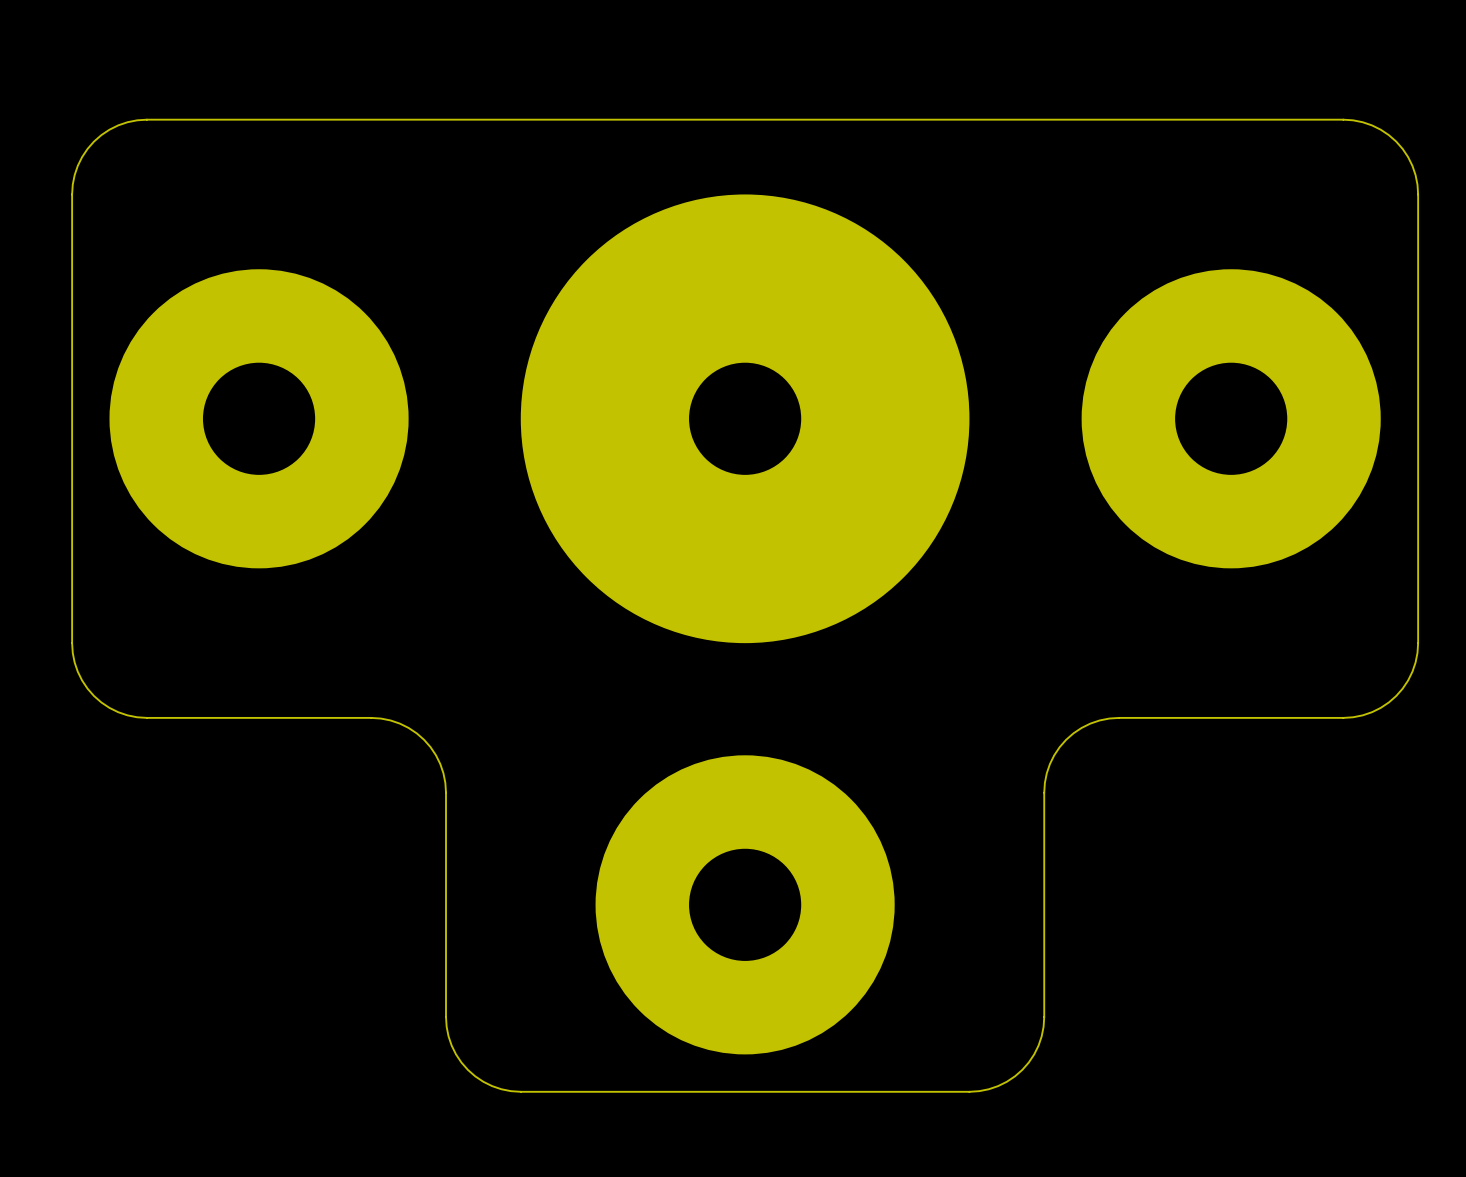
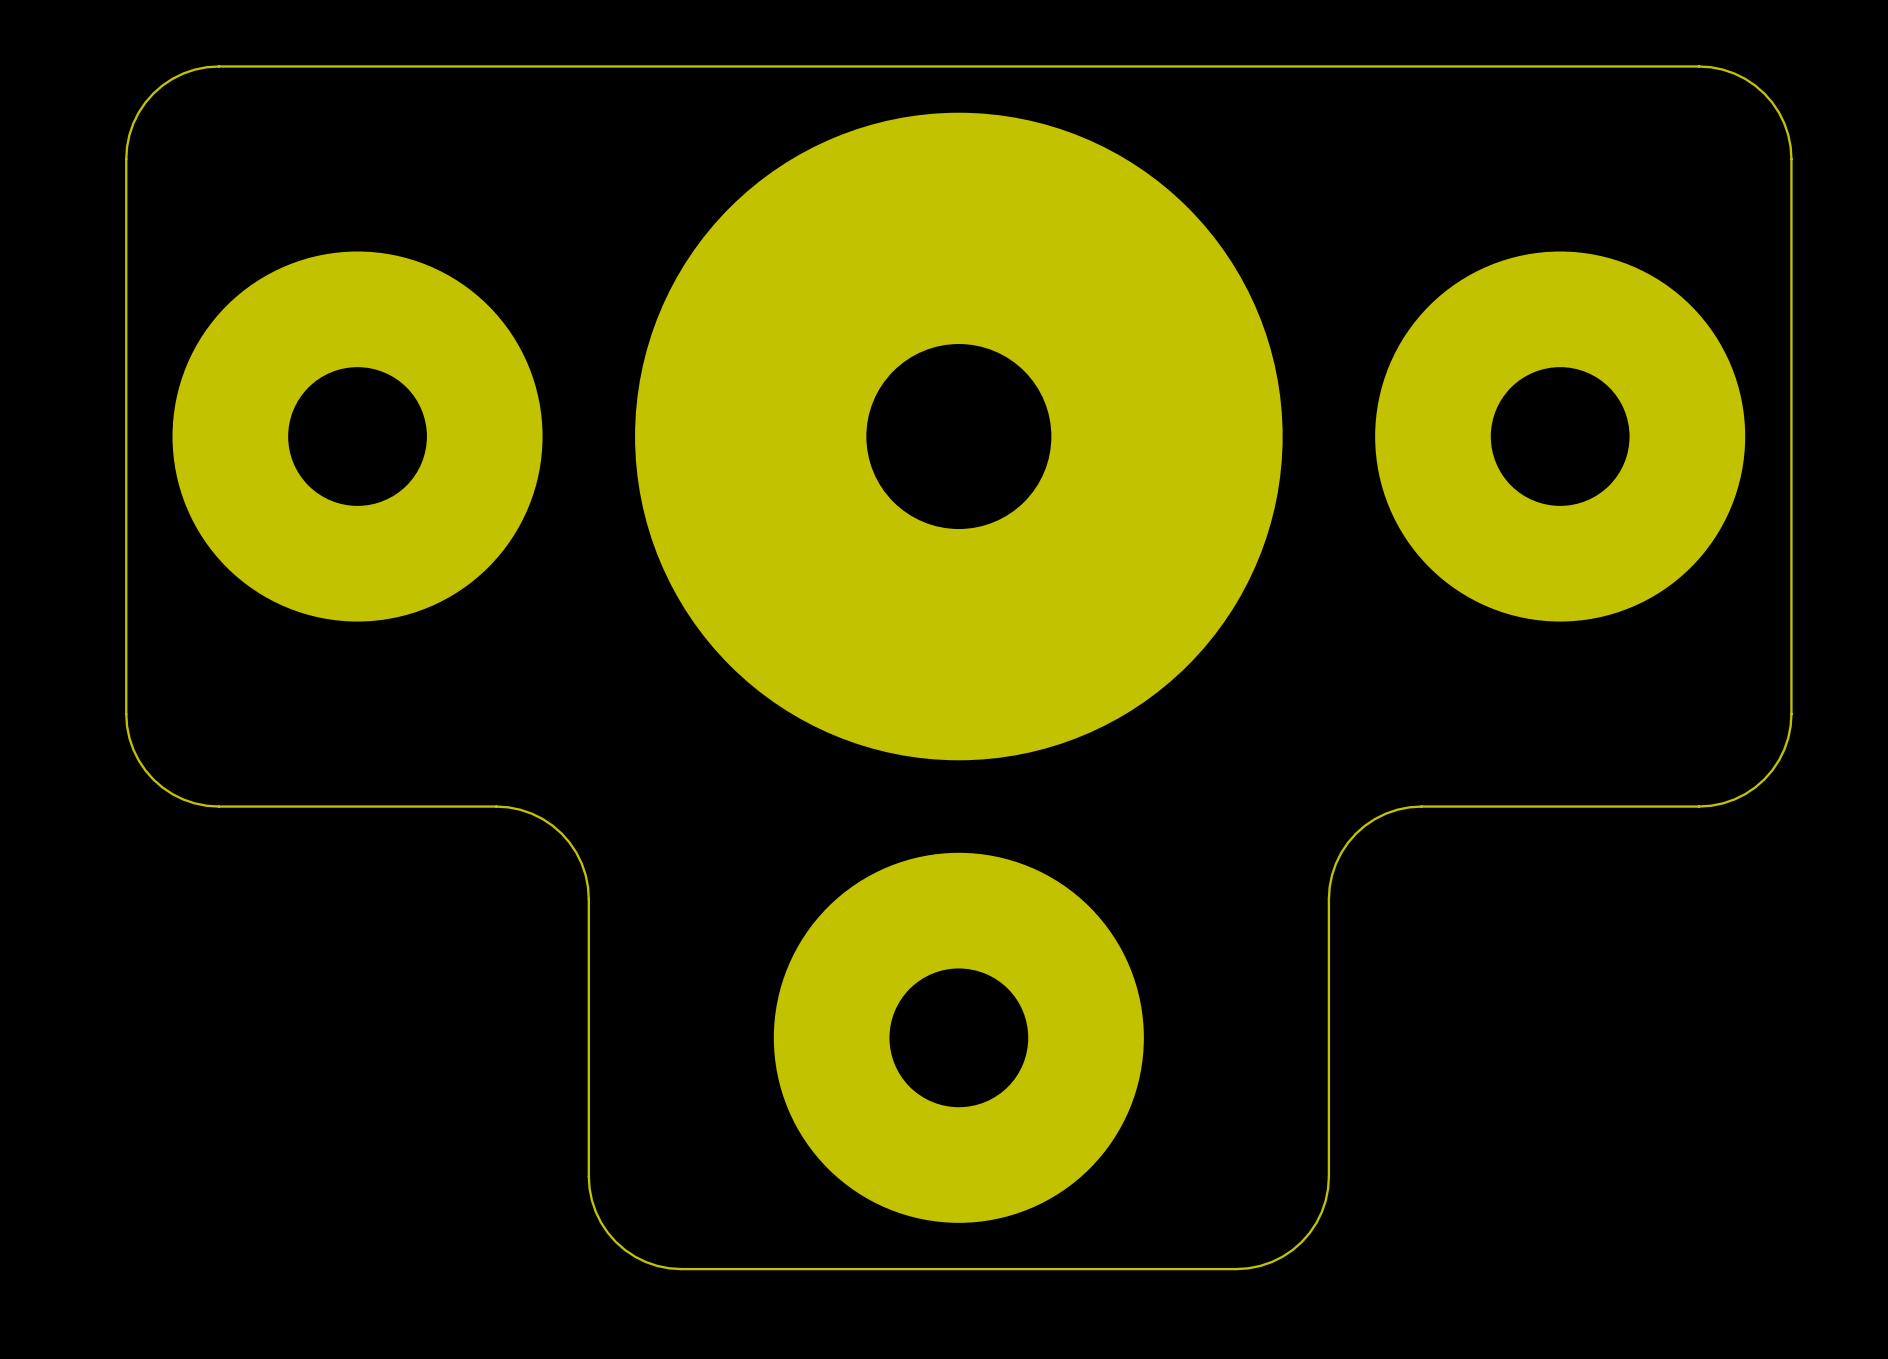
part footprint: [520, 194, 970, 644] -> [635, 112, 1283, 761]

